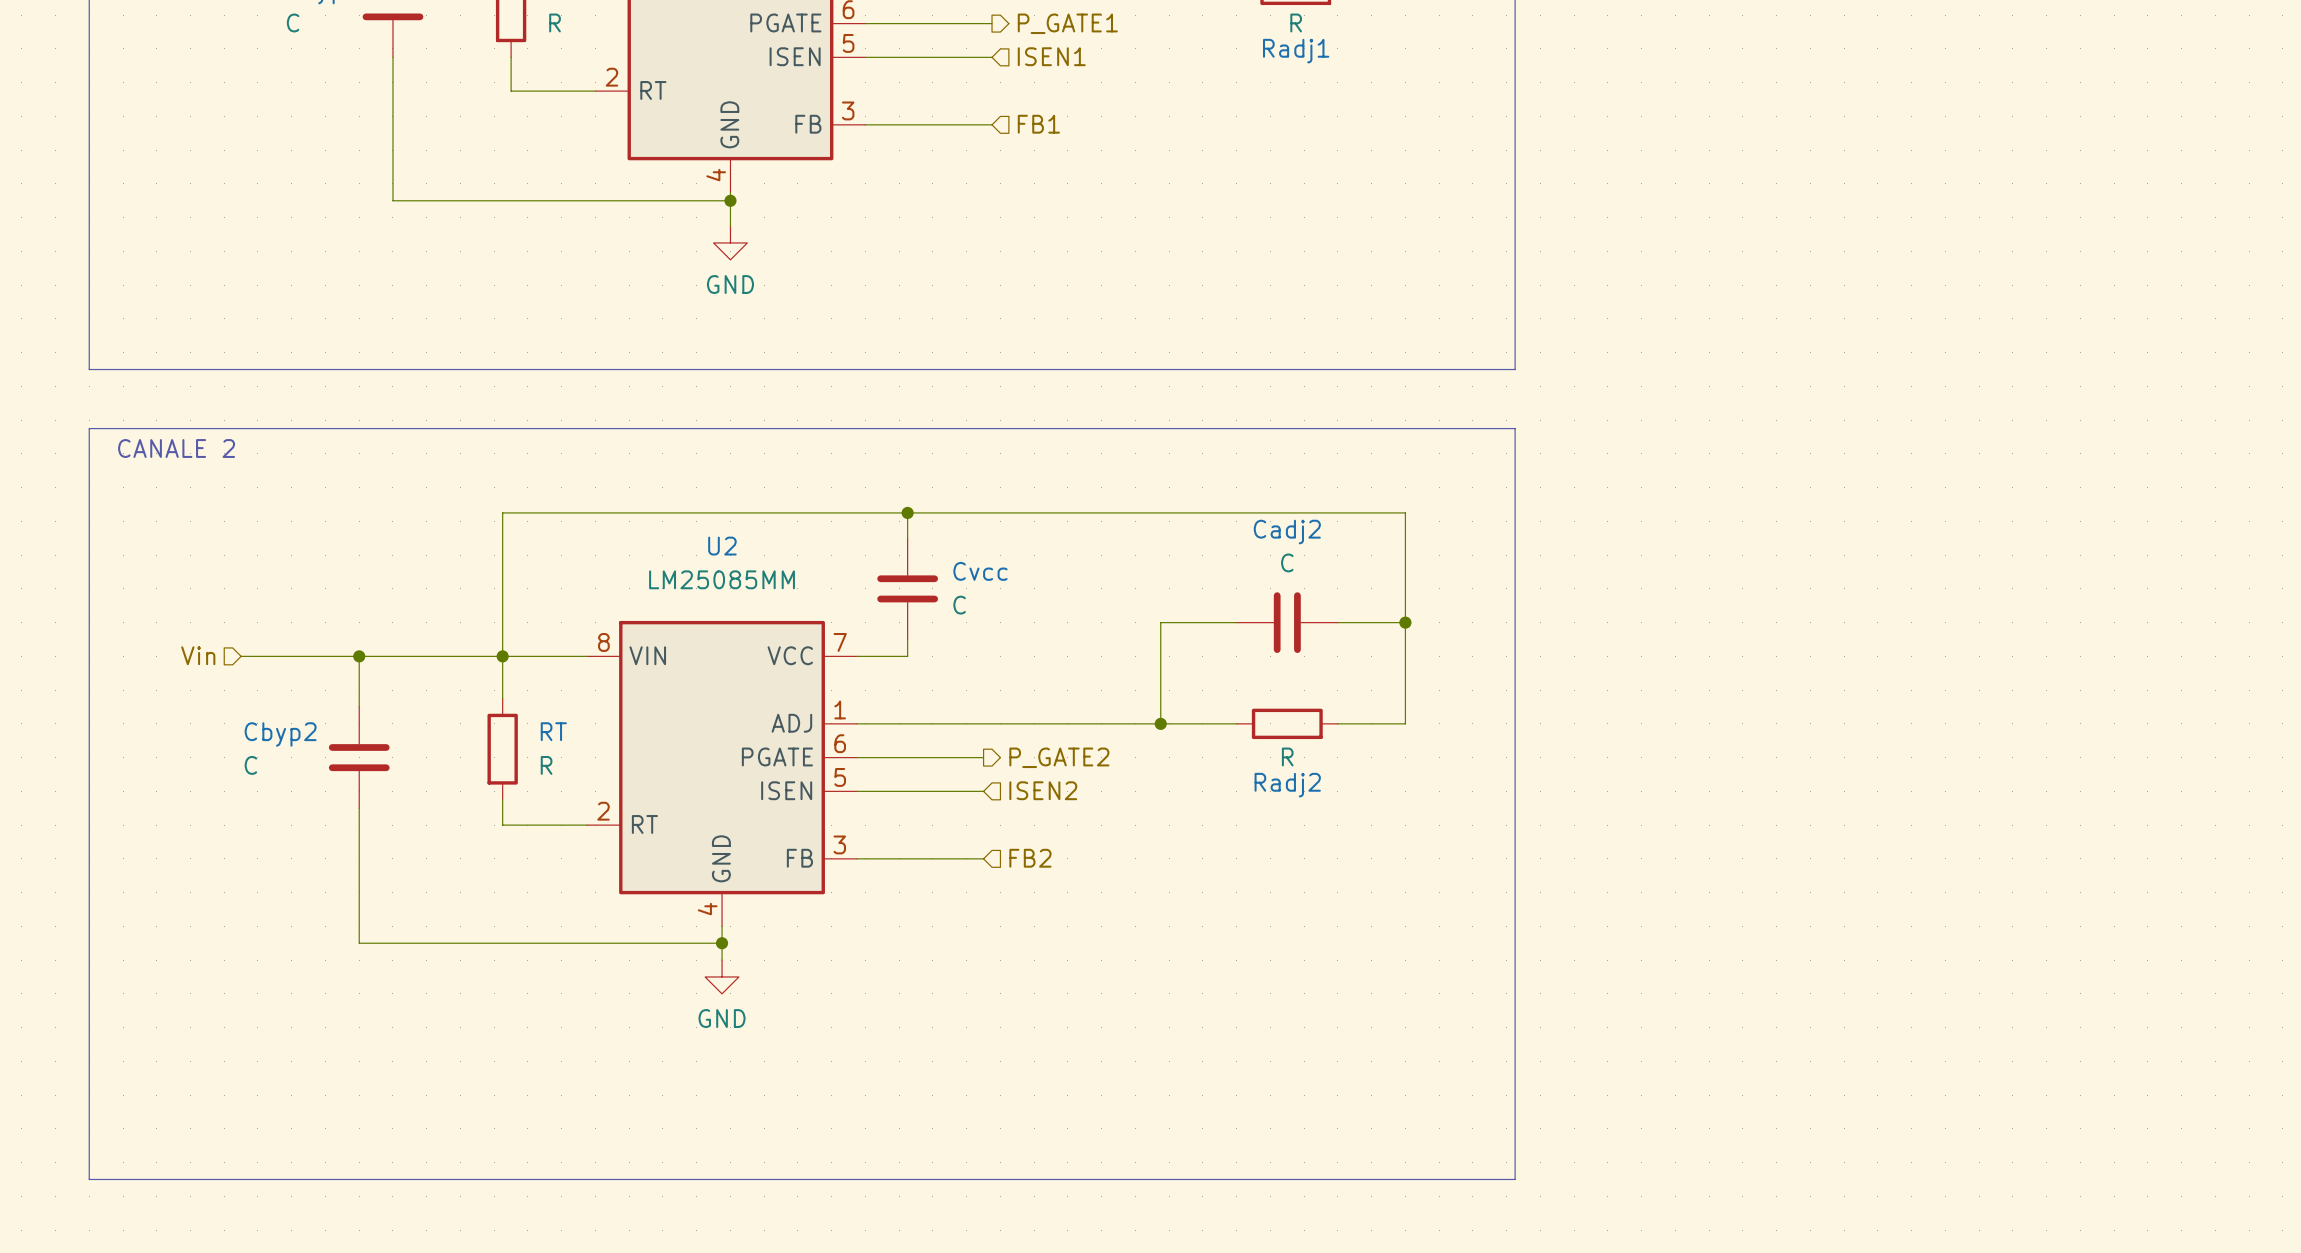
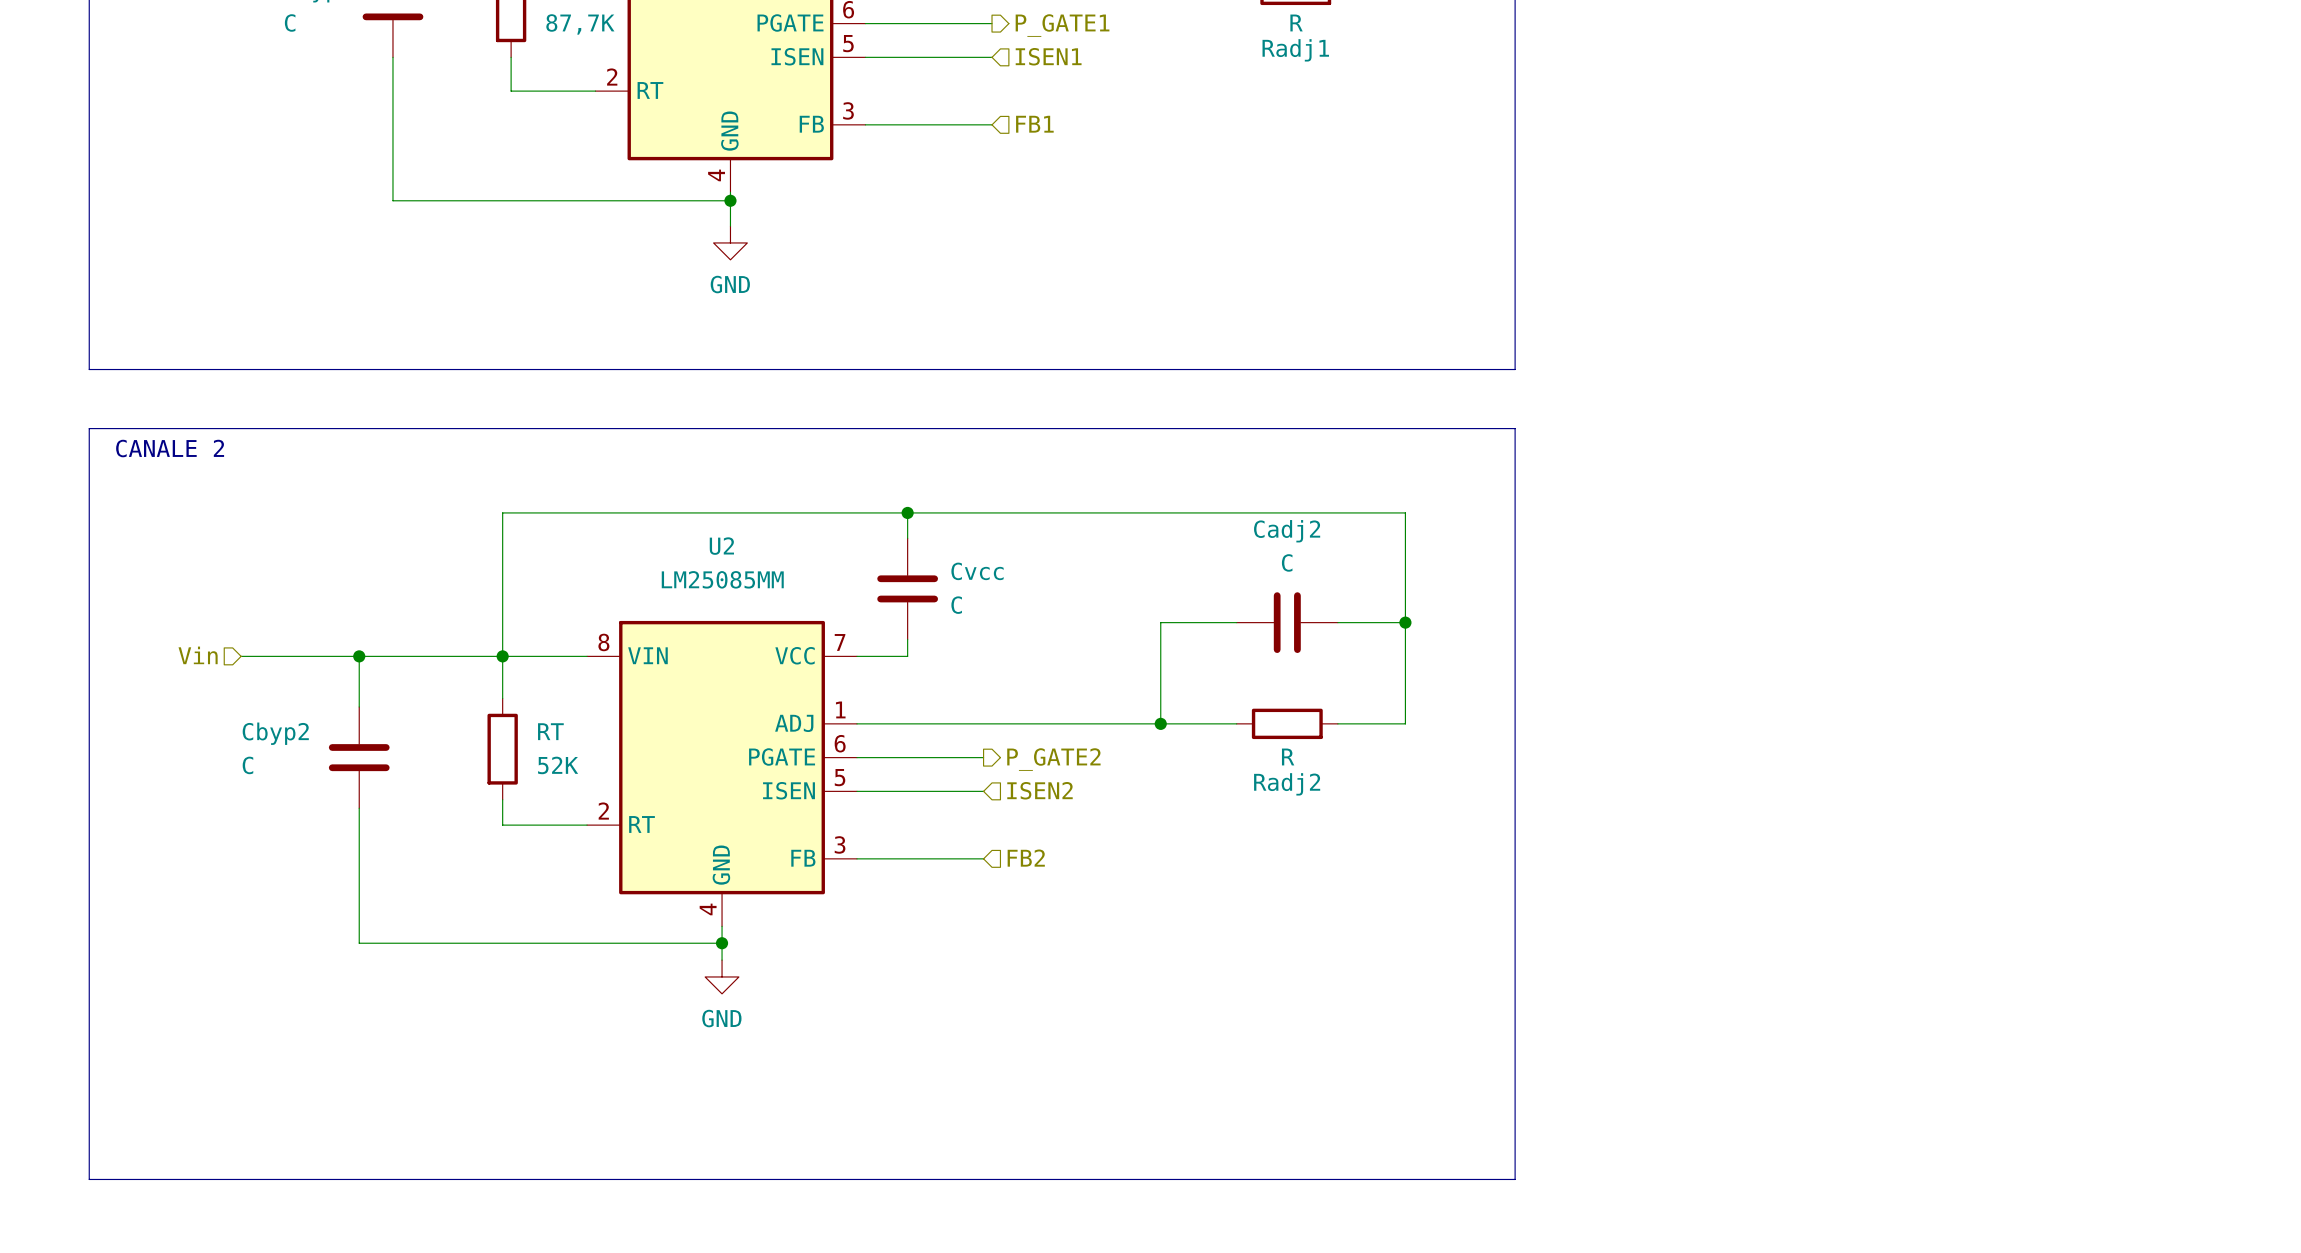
part value: R (555, 22) -> 87,7K (580, 24)
RT value: R (546, 765) -> 52K (558, 765)

